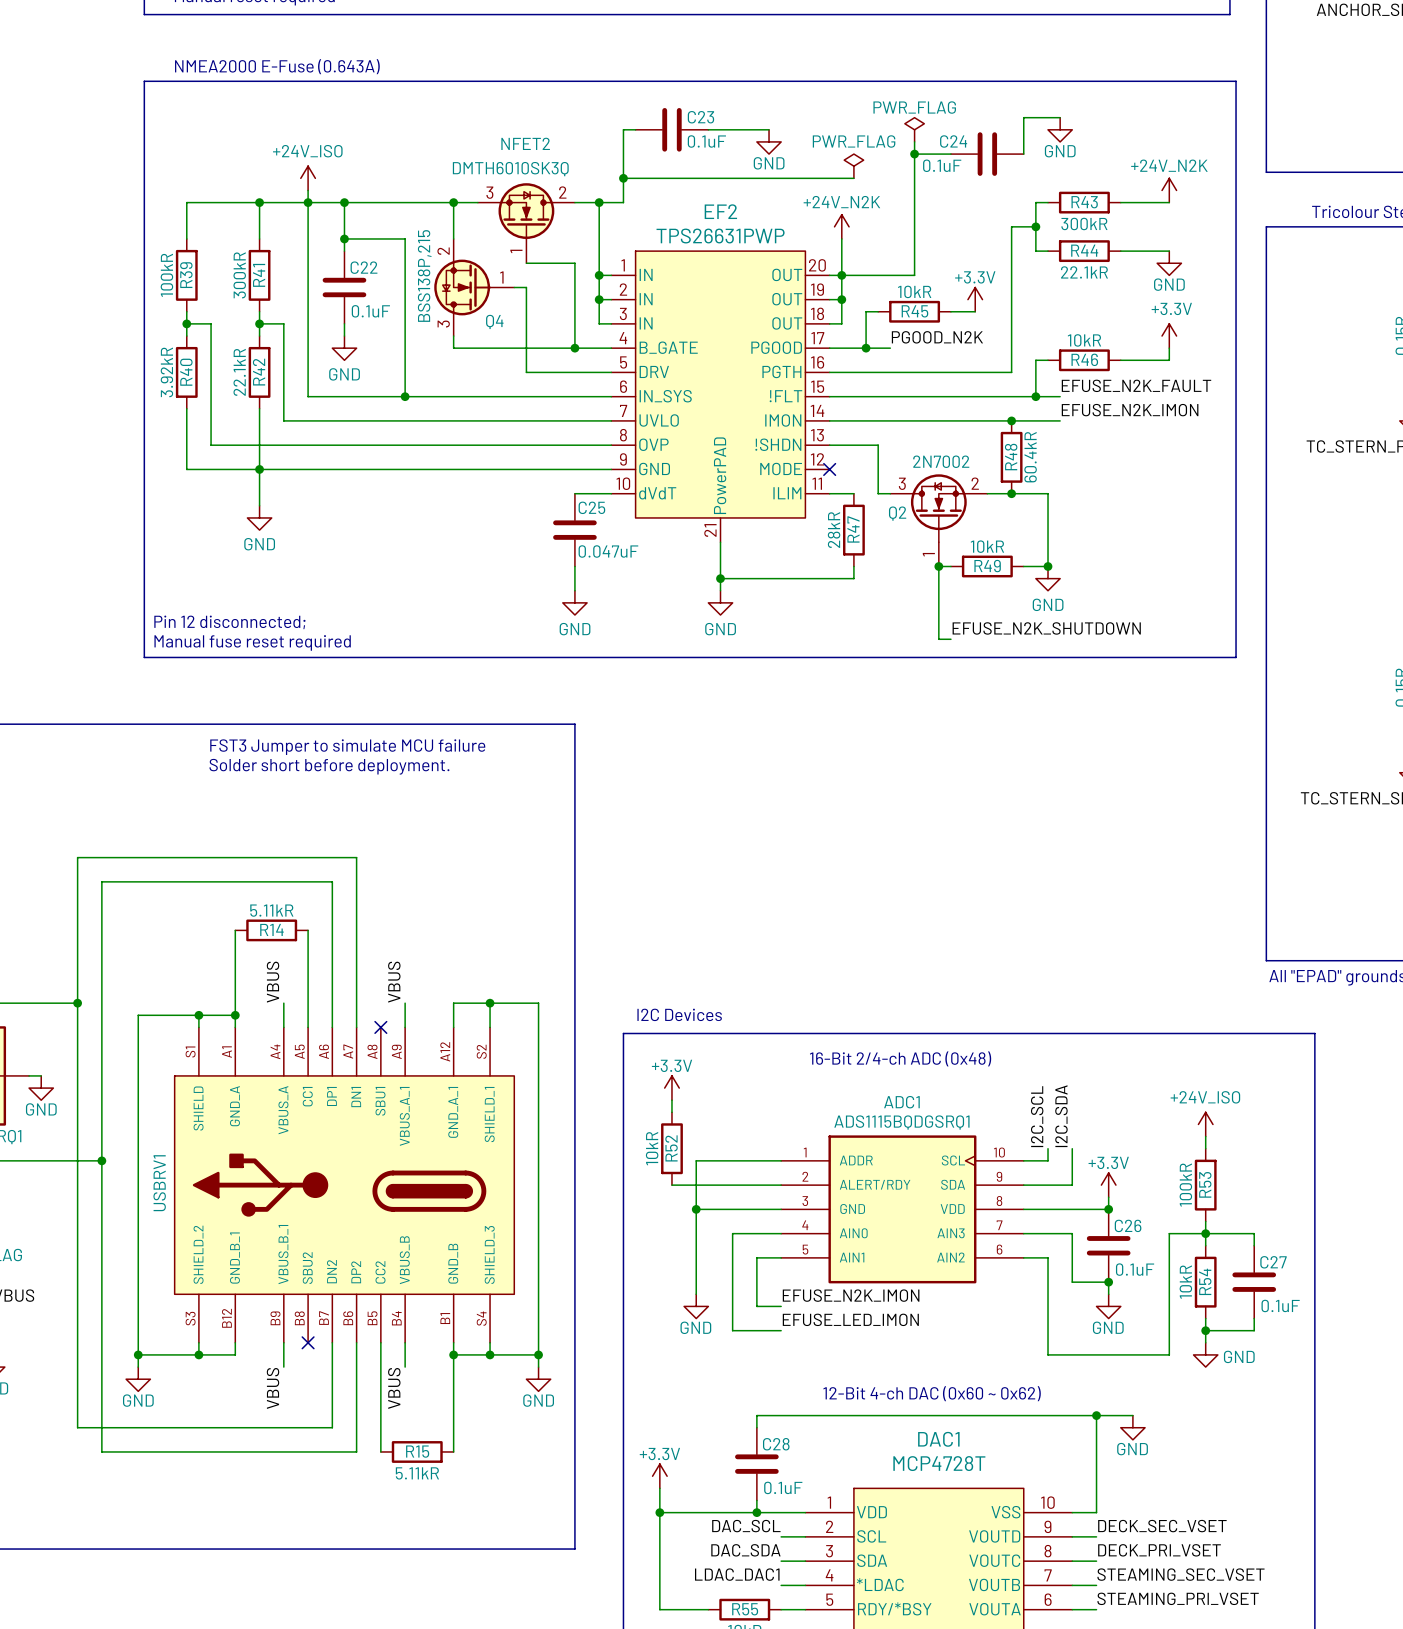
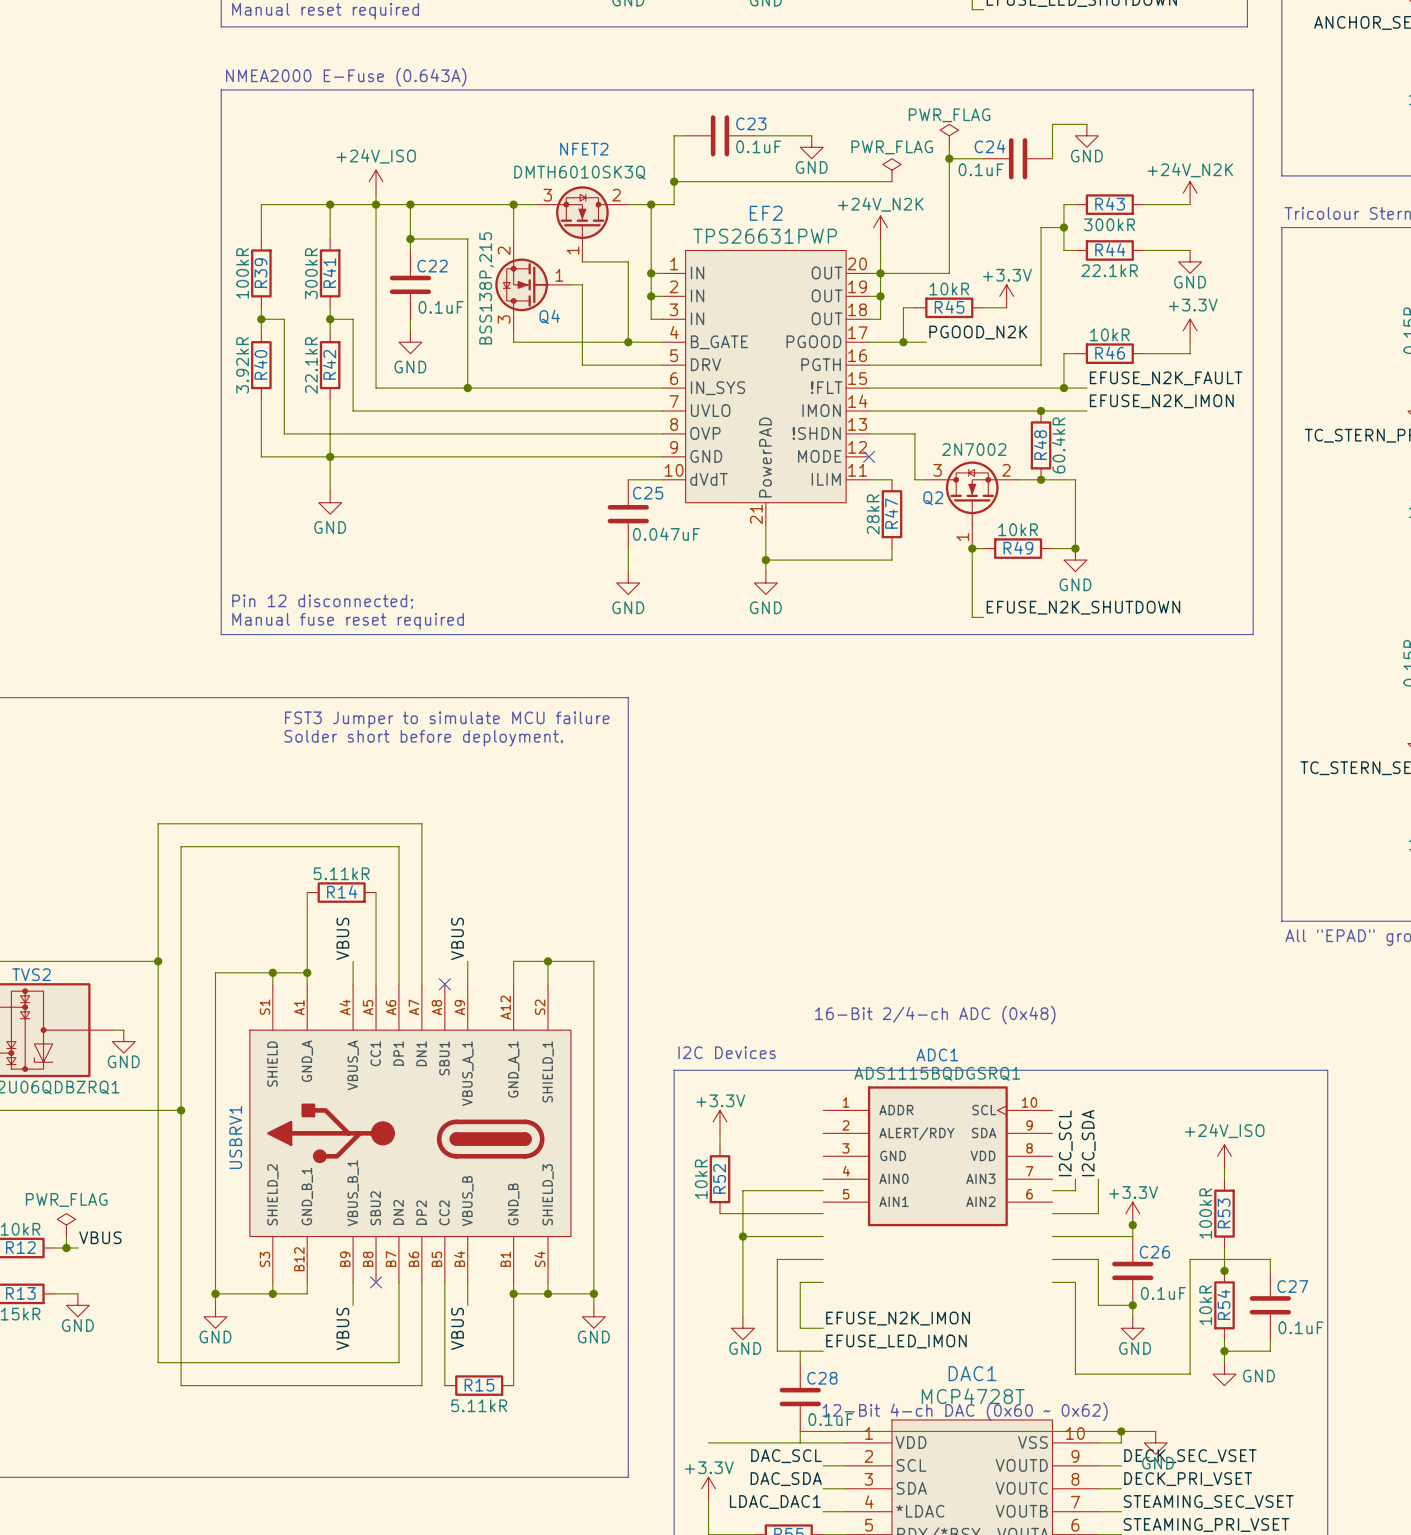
text position: I2C Devices (679, 1014) -> I2C Devices (727, 1052)
power symbol position: +3.3V (671, 1088) -> +3.3V (720, 1121)
wire: (671, 1100) (671, 1112) -> none
label position: I2C_SCL (1037, 1116) -> I2C_SCL (1065, 1143)
label position: I2C_SDA (1061, 1116) -> I2C_SDA (1088, 1143)
line: (623, 1118) (623, 1033) (1314, 1033) (1314, 1118) -> (674, 1070) (1327, 1070)
power symbol position: +24V_ISO (1205, 1124) -> +24V_ISO (1224, 1156)
wire: (1205, 1136) (1205, 1148) -> none
R52 position: (671, 1148) -> (720, 1179)
wire: (1048, 1148) (1048, 1160) (1023, 1160) -> (1075, 1179) (1075, 1190) (1052, 1190)
wire: (1072, 1148) (1072, 1185) (1023, 1185) -> none
wire: (781, 1160) (696, 1160) (696, 1245) -> (823, 1190) (742, 1190)
wire: (671, 1185) (781, 1185) -> (720, 1133) (720, 1144)
power symbol position: +3.3V (1108, 1185) -> +3.3V (1132, 1213)
R53 position: (1205, 1185) -> (1224, 1213)
wire: (1108, 1197) (1108, 1209) (1023, 1209) -> none
wire: (696, 1209) (781, 1209) -> none
junction: (696, 1209) -> none
junction: (1108, 1209) -> none
wire: (781, 1233) (732, 1233) (732, 1318) -> (823, 1259) (777, 1259)
wire: (1023, 1233) (1072, 1233) -> none
junction: (1205, 1233) -> none
C26 position: (1108, 1245) -> (1132, 1270)
wire: (1254, 1245) (1254, 1233) (1169, 1233) (1169, 1318) -> (1270, 1259) (1190, 1259)
wire: (781, 1257) (756, 1257) (756, 1306) (781, 1306) -> (823, 1282) (800, 1282) (800, 1328) (823, 1328)
wire: (1023, 1257) (1048, 1257) (1048, 1342) -> (1052, 1282) (1075, 1282)
wire: none -> (720, 1213) (823, 1213)
wire: (1072, 1270) (1072, 1282) (1108, 1282) -> (1098, 1213) (1052, 1213)
R54 position: (1205, 1282) -> (1224, 1305)
C27 position: (1254, 1282) -> (1270, 1305)
junction: none -> (742, 1236)
wire: none -> (823, 1236) (742, 1236) (742, 1316)
wire: none -> (1052, 1236) (1132, 1236)
label position: EFUSE_N2K_IMON (851, 1295) -> EFUSE_N2K_IMON (898, 1318)
power symbol position: GND (696, 1306) -> GND (742, 1328)
power symbol: GND (1108, 1306) -> none
wire: none -> (1052, 1259) (1098, 1259) (1098, 1305) (1132, 1305) (1132, 1316)
label position: EFUSE_LED_IMON (850, 1319) -> EFUSE_LED_IMON (896, 1341)
wire: (732, 1330) (781, 1330) -> (777, 1270) (777, 1351) (800, 1351)
wire: (1254, 1330) (1205, 1330) (1205, 1342) -> none
wire: (1048, 1354) (1169, 1354) -> (1075, 1293) (1075, 1374) (1190, 1374) (1190, 1293)
power symbol: GND (1205, 1354) -> none
junction: none -> (1132, 1305)
power symbol: none -> GND (1132, 1328)
text position: 12-Bit 4-ch DAC (0x60 ~ 0x62) (932, 1393) -> 12-Bit 4-ch DAC (0x60 ~ 0x62) (965, 1411)
wire: none -> (1224, 1339) (1224, 1362)
wire: none -> (1270, 1339) (1270, 1351) (1224, 1351)
wire: (781, 1415) (1132, 1415) -> none
wire: (1096, 1415) (1096, 1500) -> none
junction: (1096, 1415) -> none
junction: none -> (1224, 1351)
power symbol: GND (1132, 1427) -> none
power symbol: none -> GND (1224, 1374)
power symbol: +3.3V (659, 1476) -> none
wire: (659, 1488) (659, 1573) -> none
wire: none -> (800, 1431) (1155, 1431)
junction: none -> (1121, 1431)
junction: (659, 1512) -> none
junction: (756, 1512) -> none
power symbol: none -> GND (1155, 1442)
power symbol: none -> +3.3V (708, 1488)

